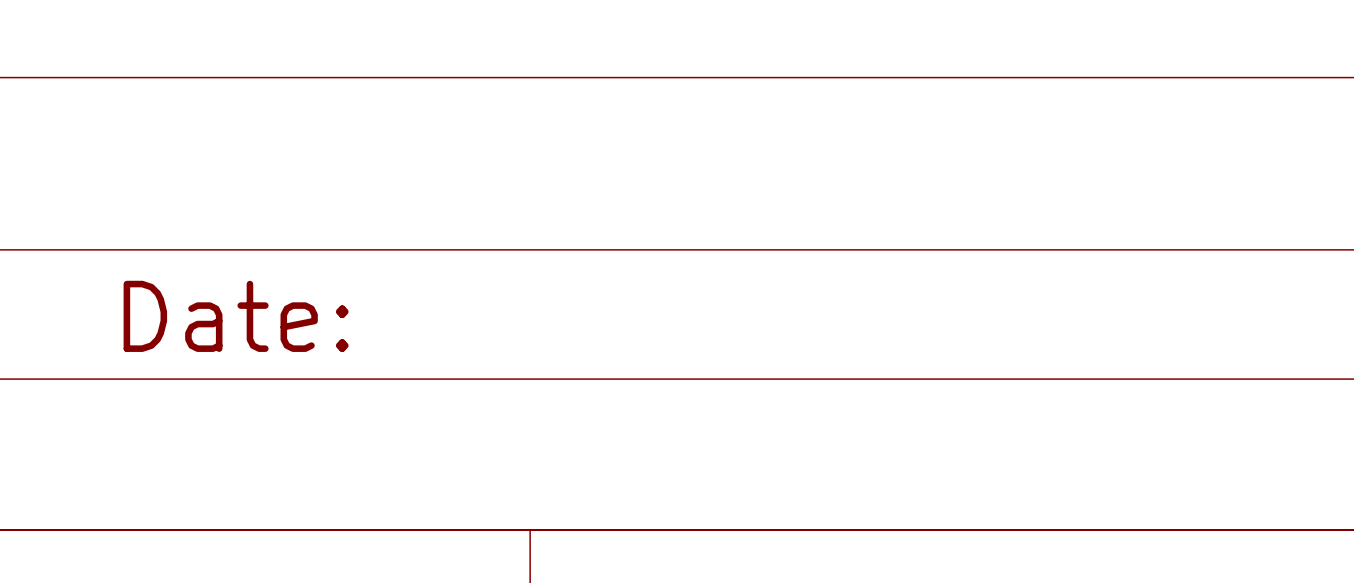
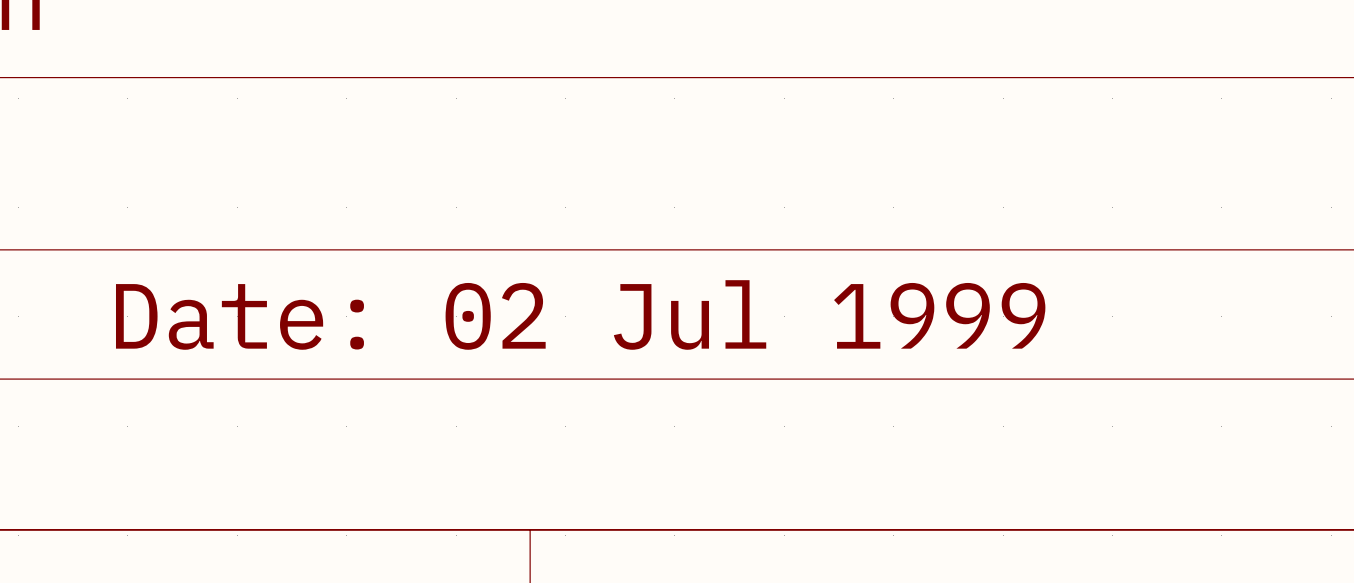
title block: Date: (236, 316) -> Date: 02 Jul 1999 (580, 314)

